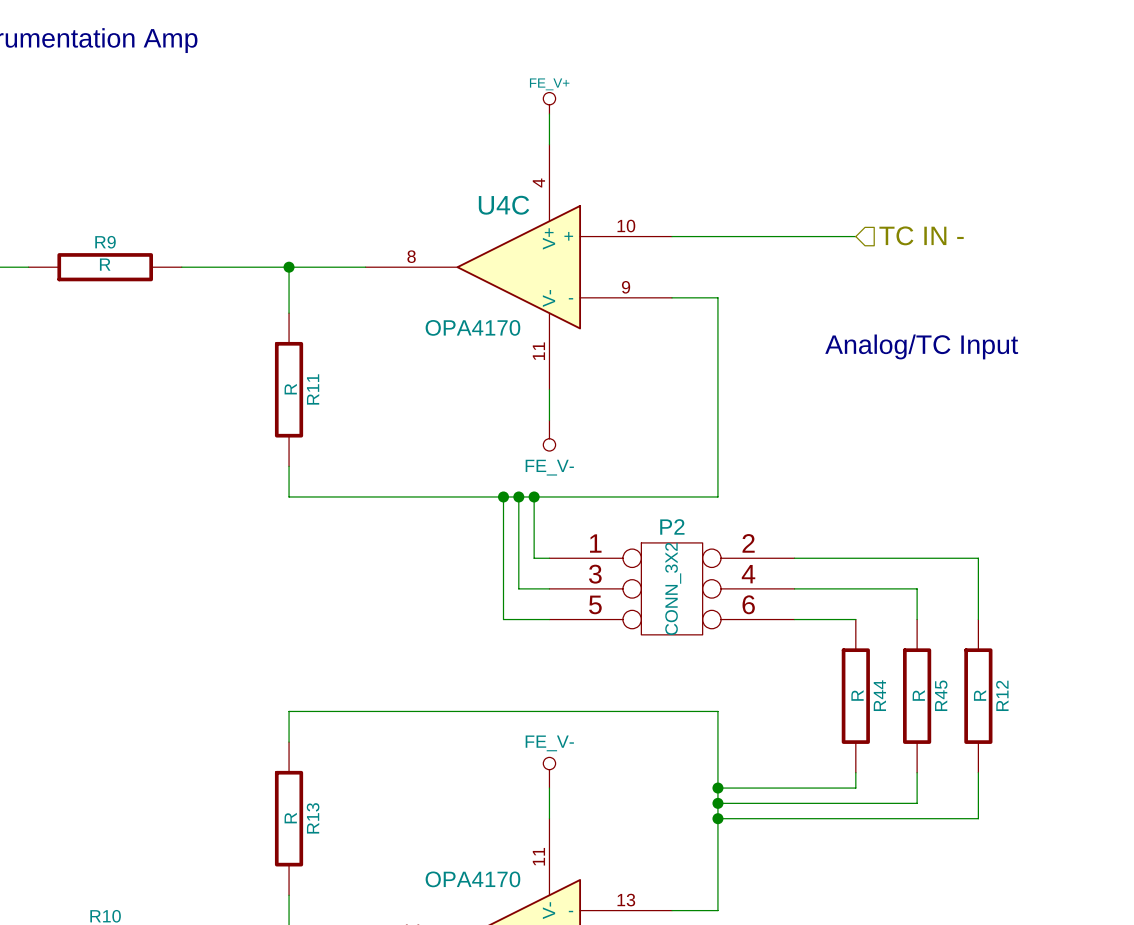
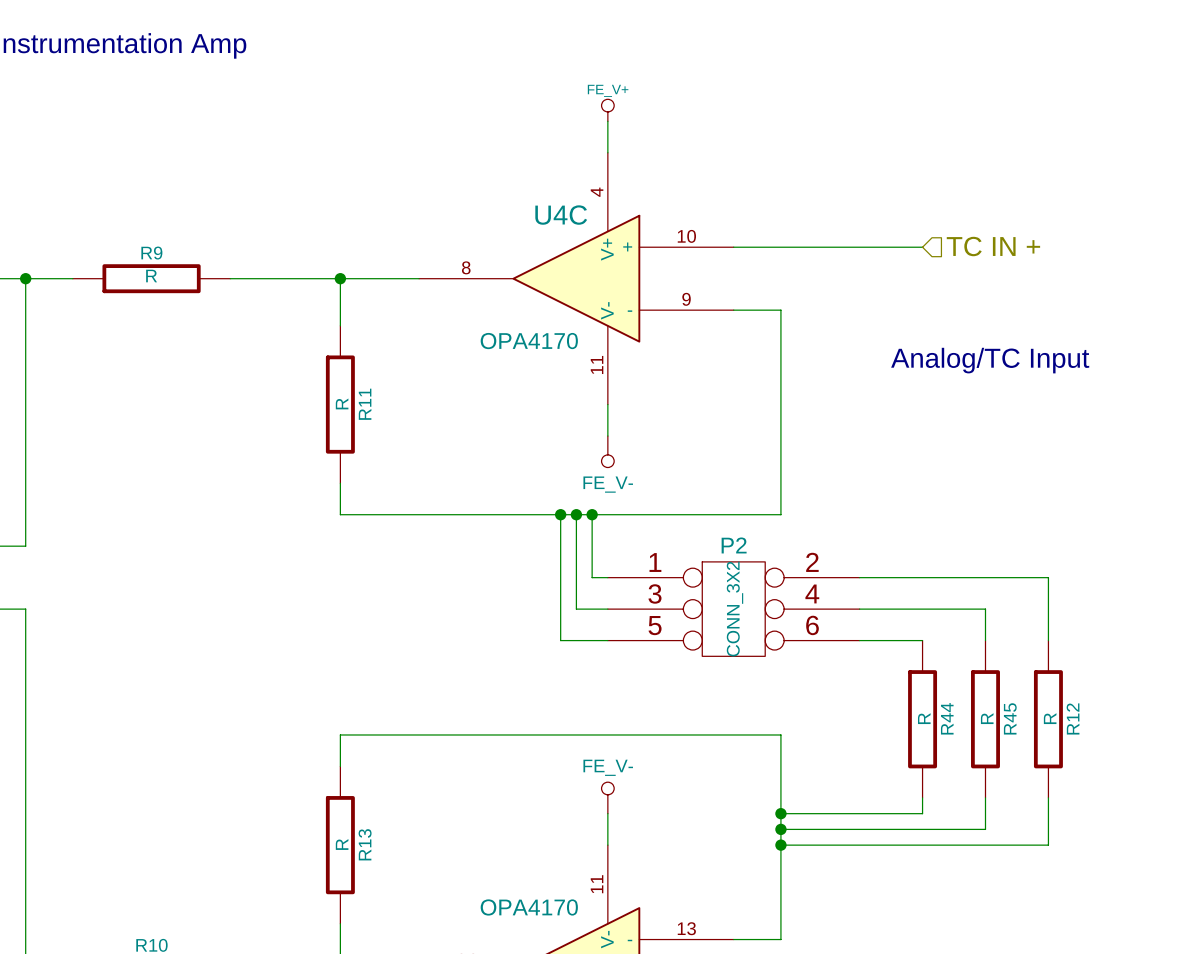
hierarchical label: TC IN - (921, 235) -> TC IN + (993, 246)

